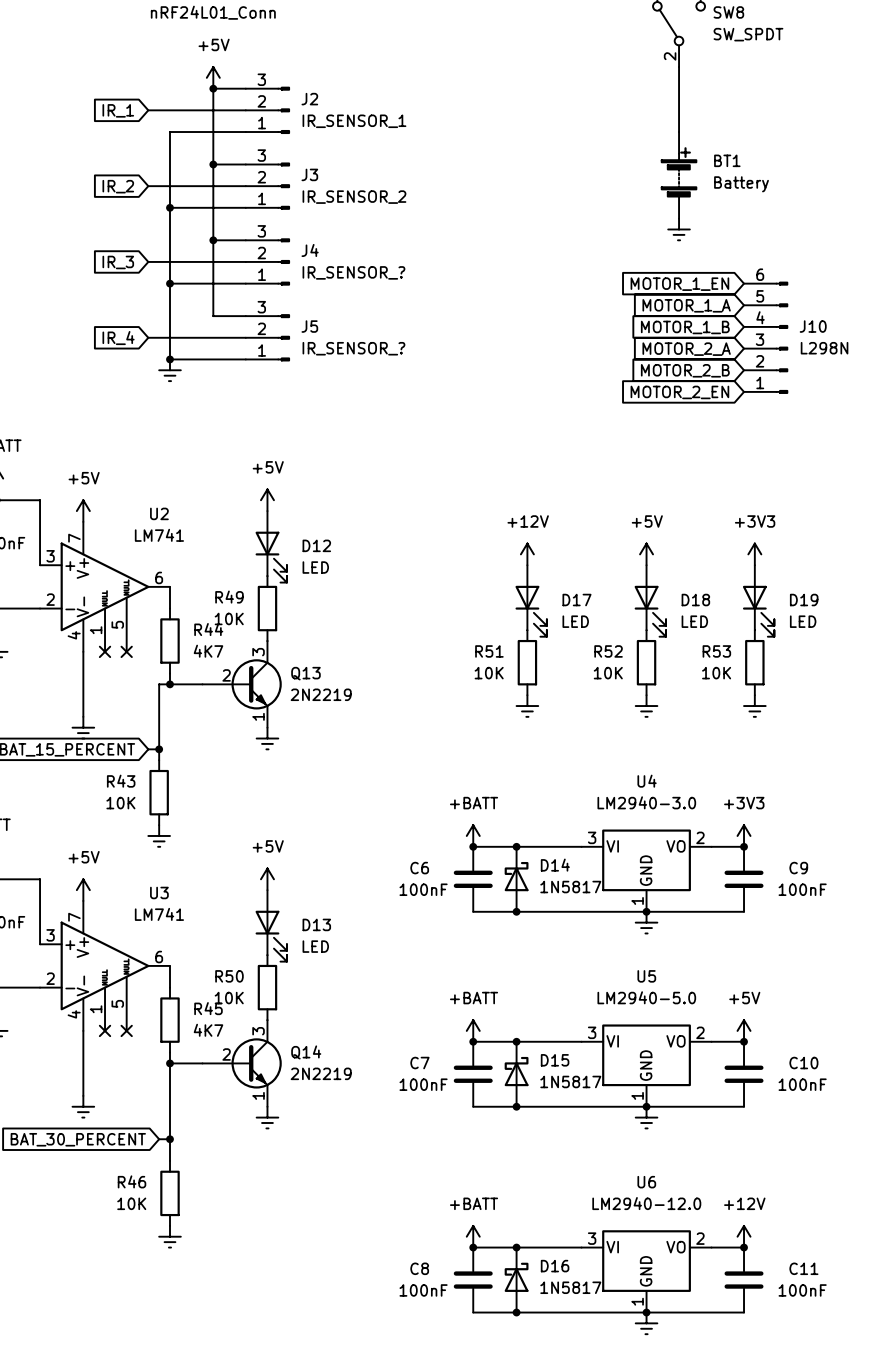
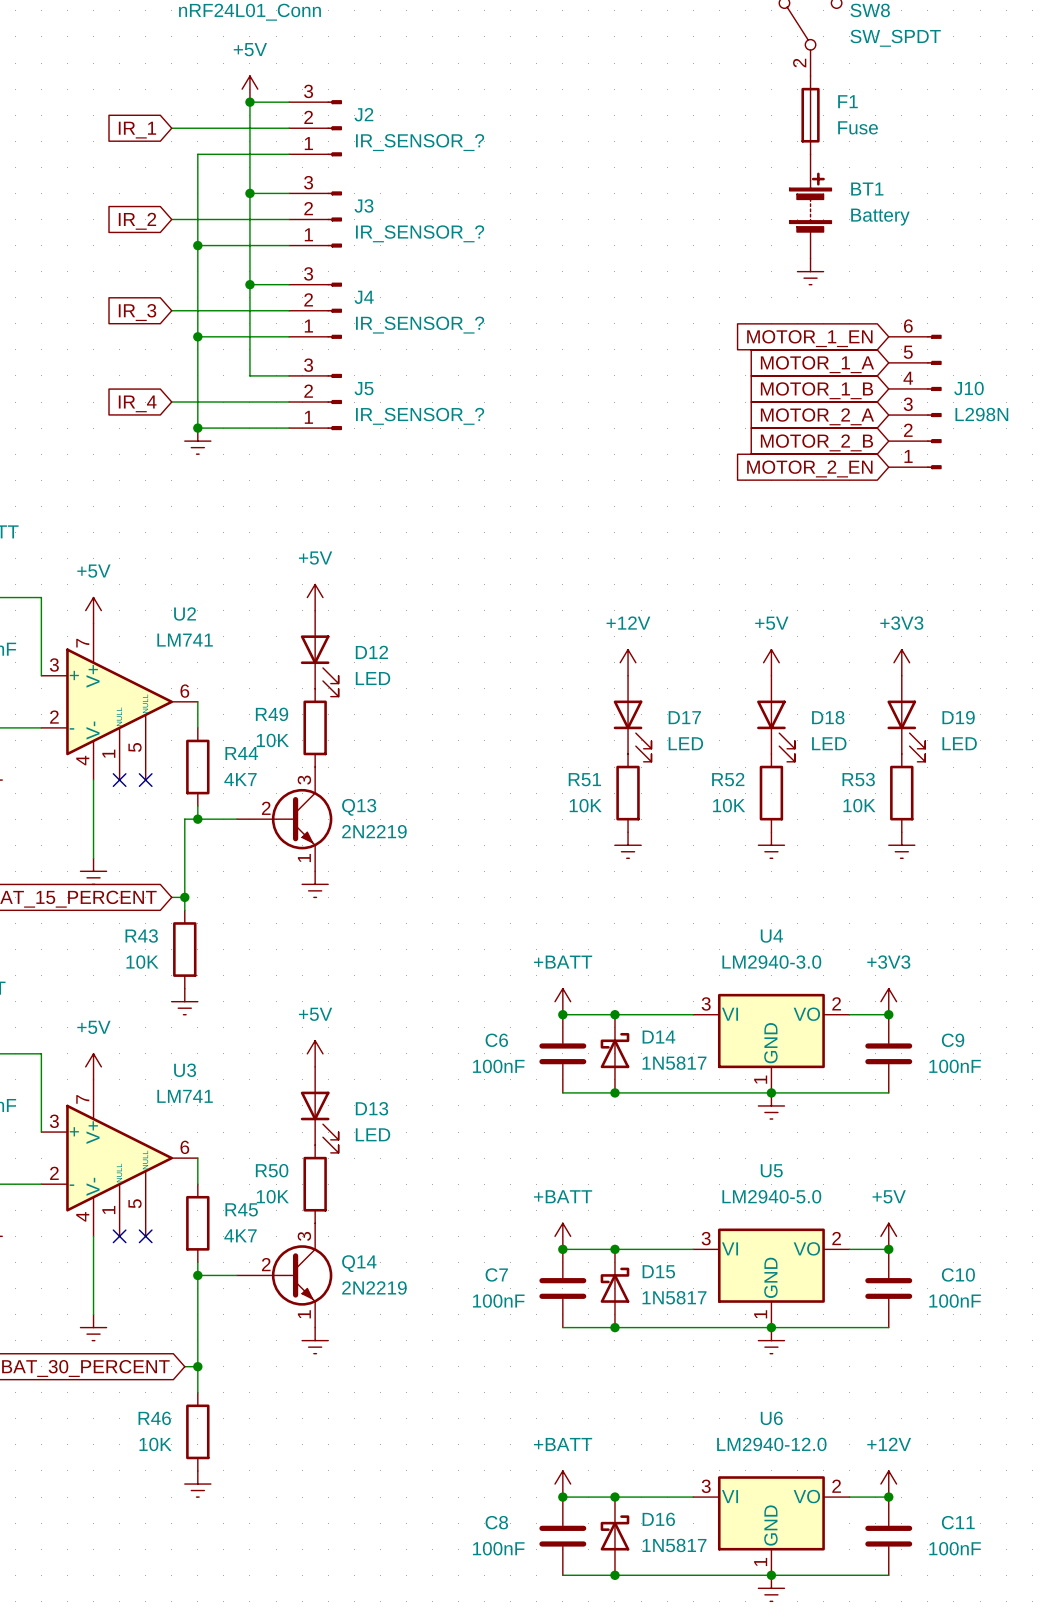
F1: none -> Fuse (810, 115)
J2 value: IR_SENSOR_1 (354, 121) -> IR_SENSOR_? (420, 142)
J3 value: IR_SENSOR_2 (354, 197) -> IR_SENSOR_? (420, 233)

